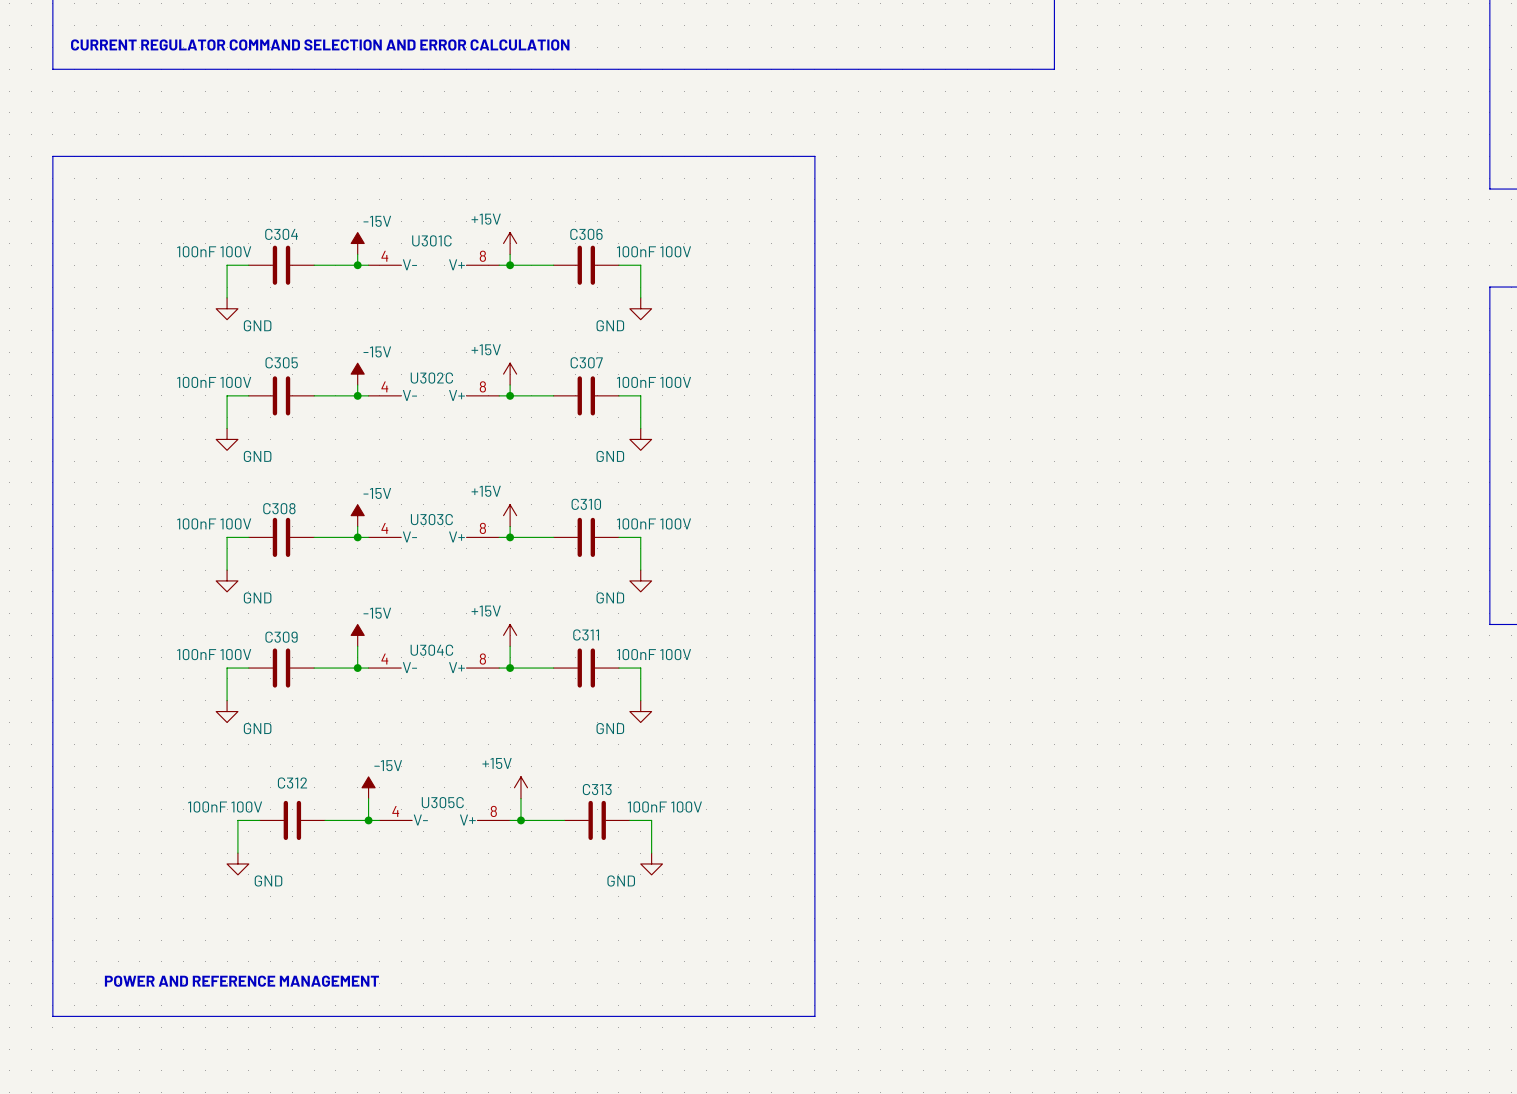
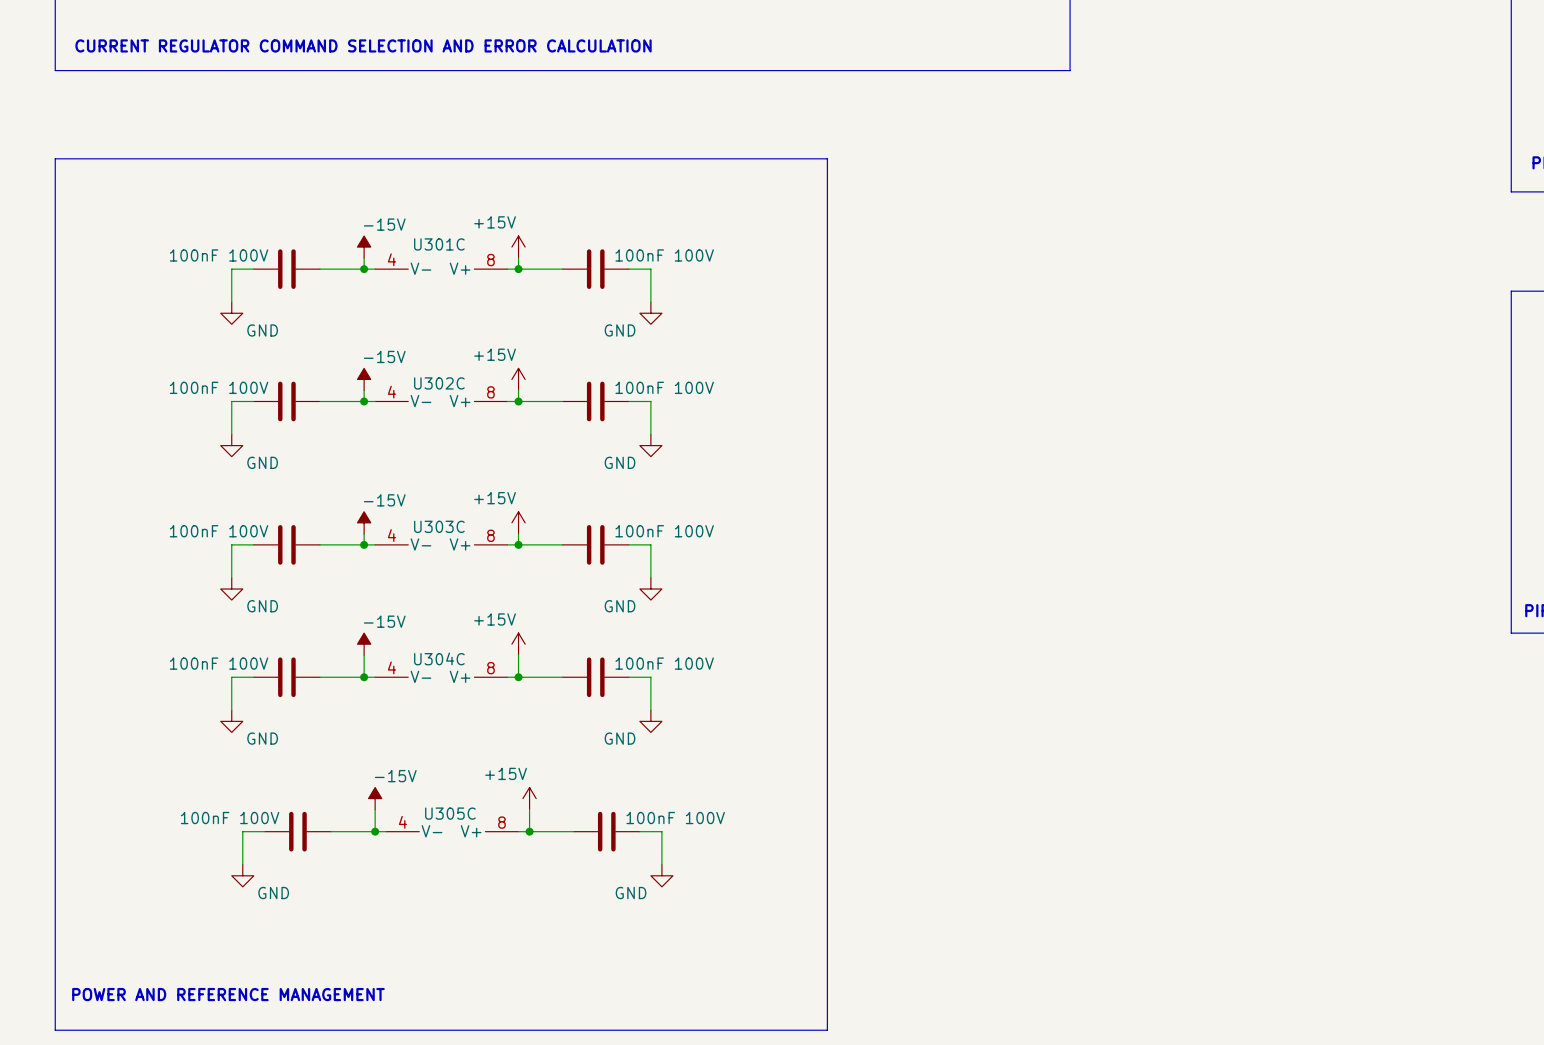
C304 name: C304 (281, 234) -> none
C306 name: C306 (586, 234) -> none
C305 name: C305 (281, 362) -> none
C307 name: C307 (586, 362) -> none
C310 name: C310 (586, 504) -> none
C308 name: C308 (279, 508) -> none
C311 name: C311 (586, 634) -> none
C309 name: C309 (281, 637) -> none
C312 name: C312 (292, 783) -> none
C313 name: C313 (597, 789) -> none

